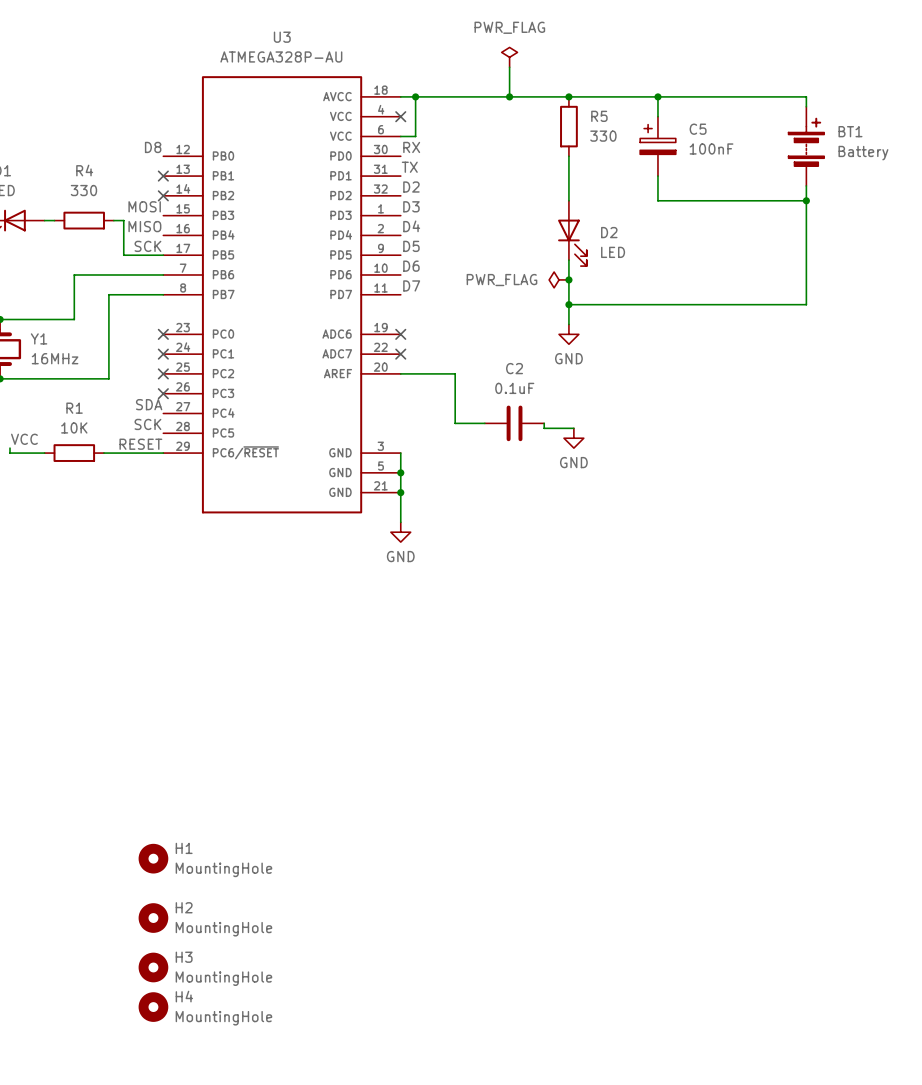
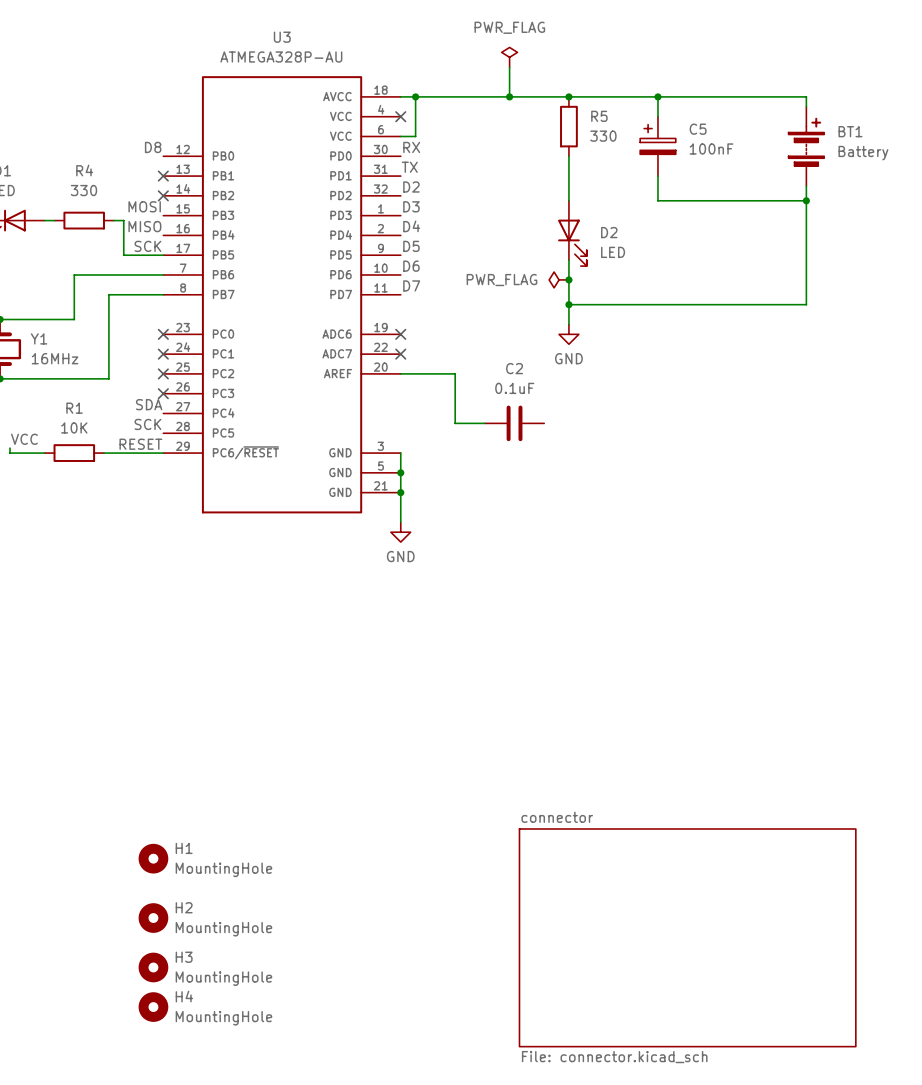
wire: (544, 423) (544, 428) (573, 428) -> none
power symbol: GND (573, 438) -> none
sheet connector: none -> File: connector.kicad_sch (687, 937)

